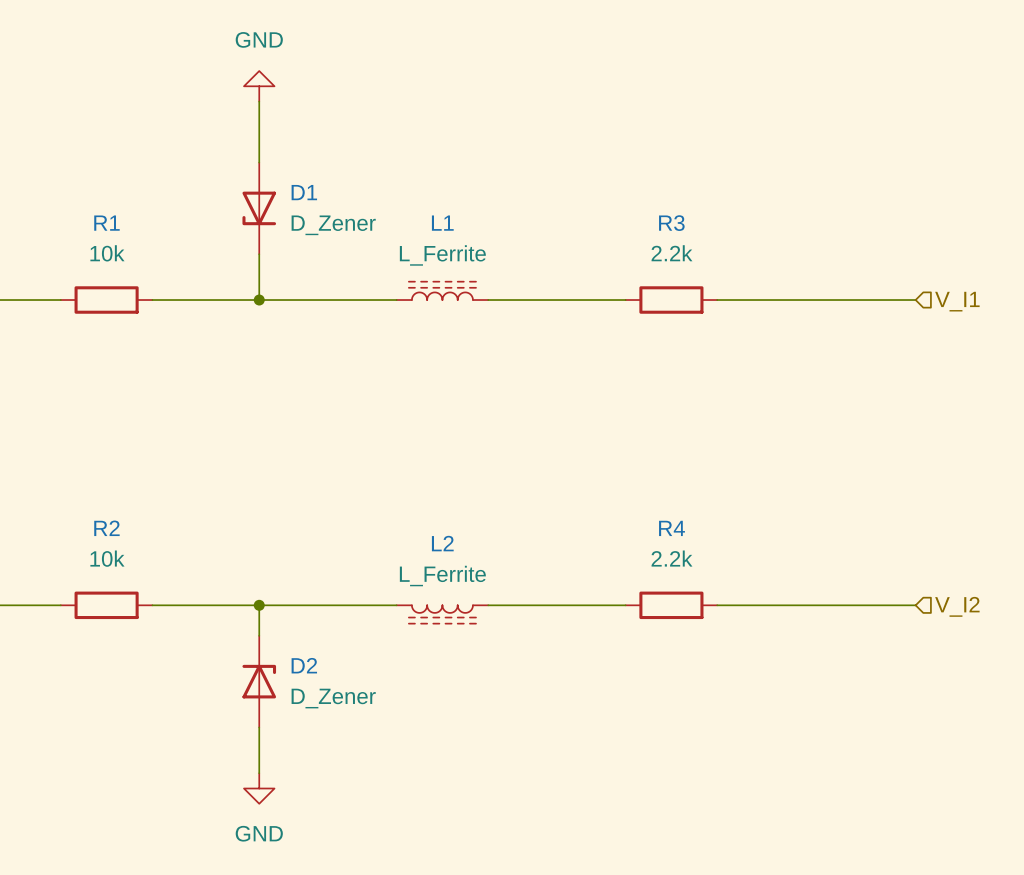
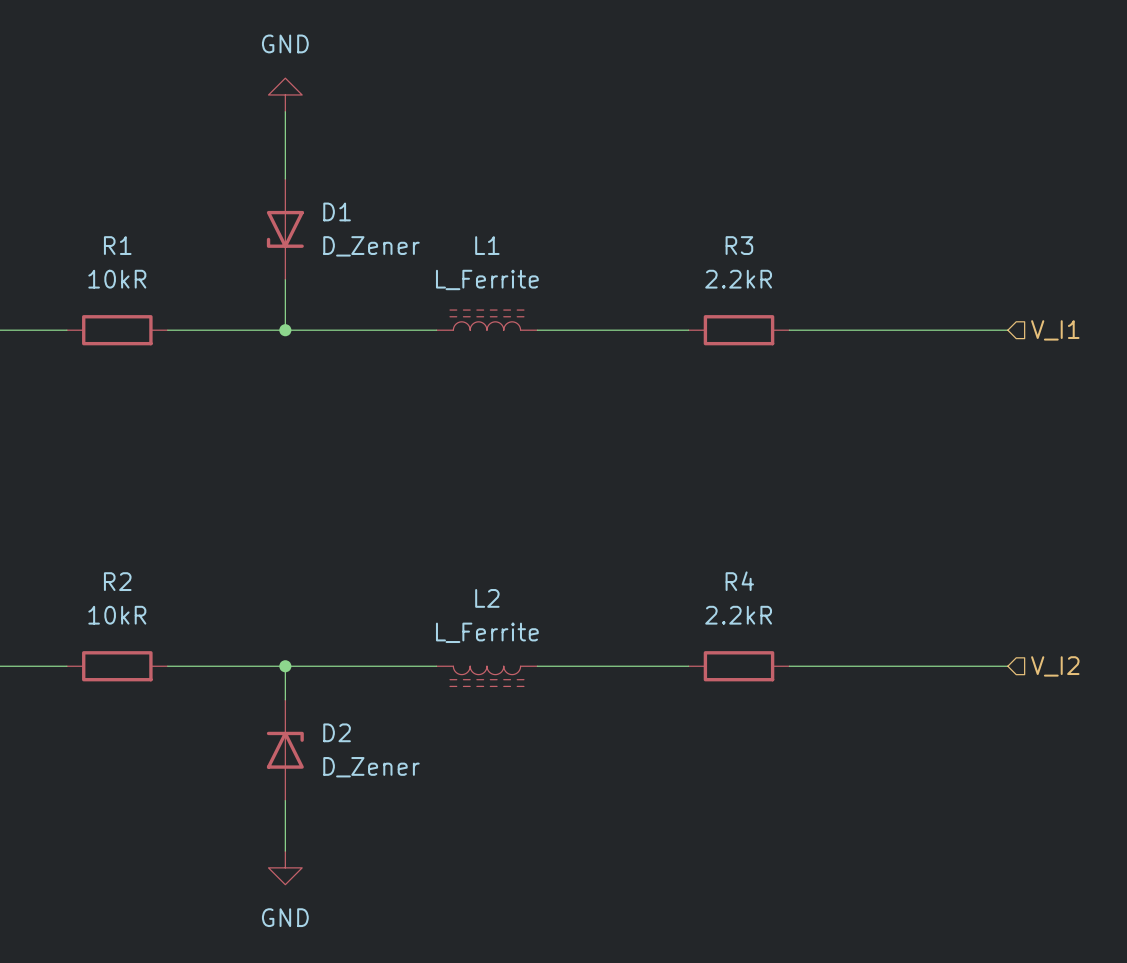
R1 value: 10k (107, 253) -> 10kR (117, 279)
R3 value: 2.2k (671, 253) -> 2.2kR (738, 279)
R2 value: 10k (107, 558) -> 10kR (117, 615)
R4 value: 2.2k (671, 558) -> 2.2kR (738, 615)

